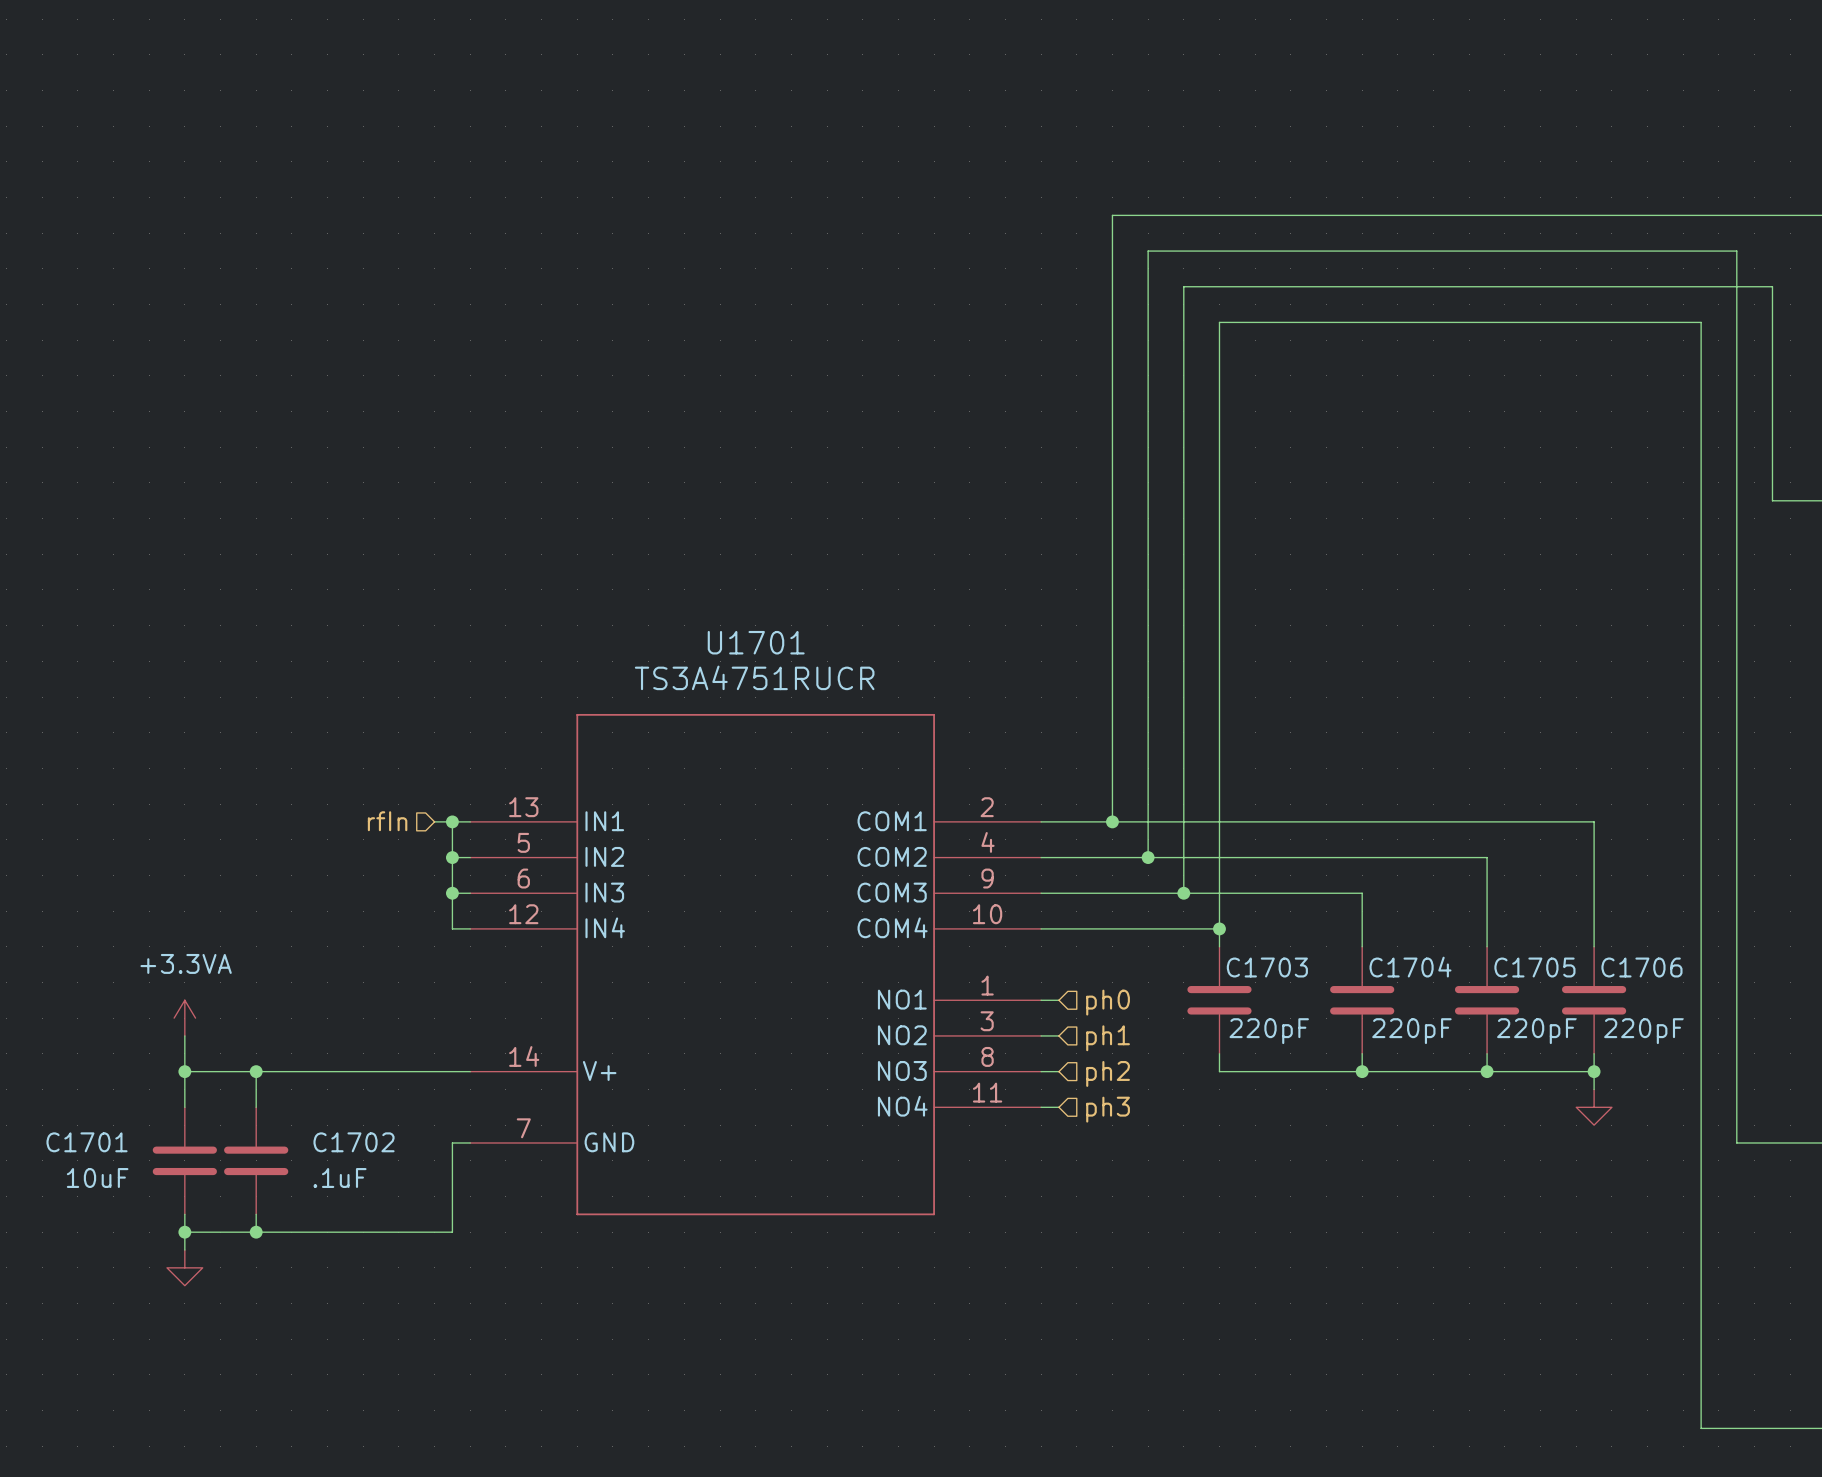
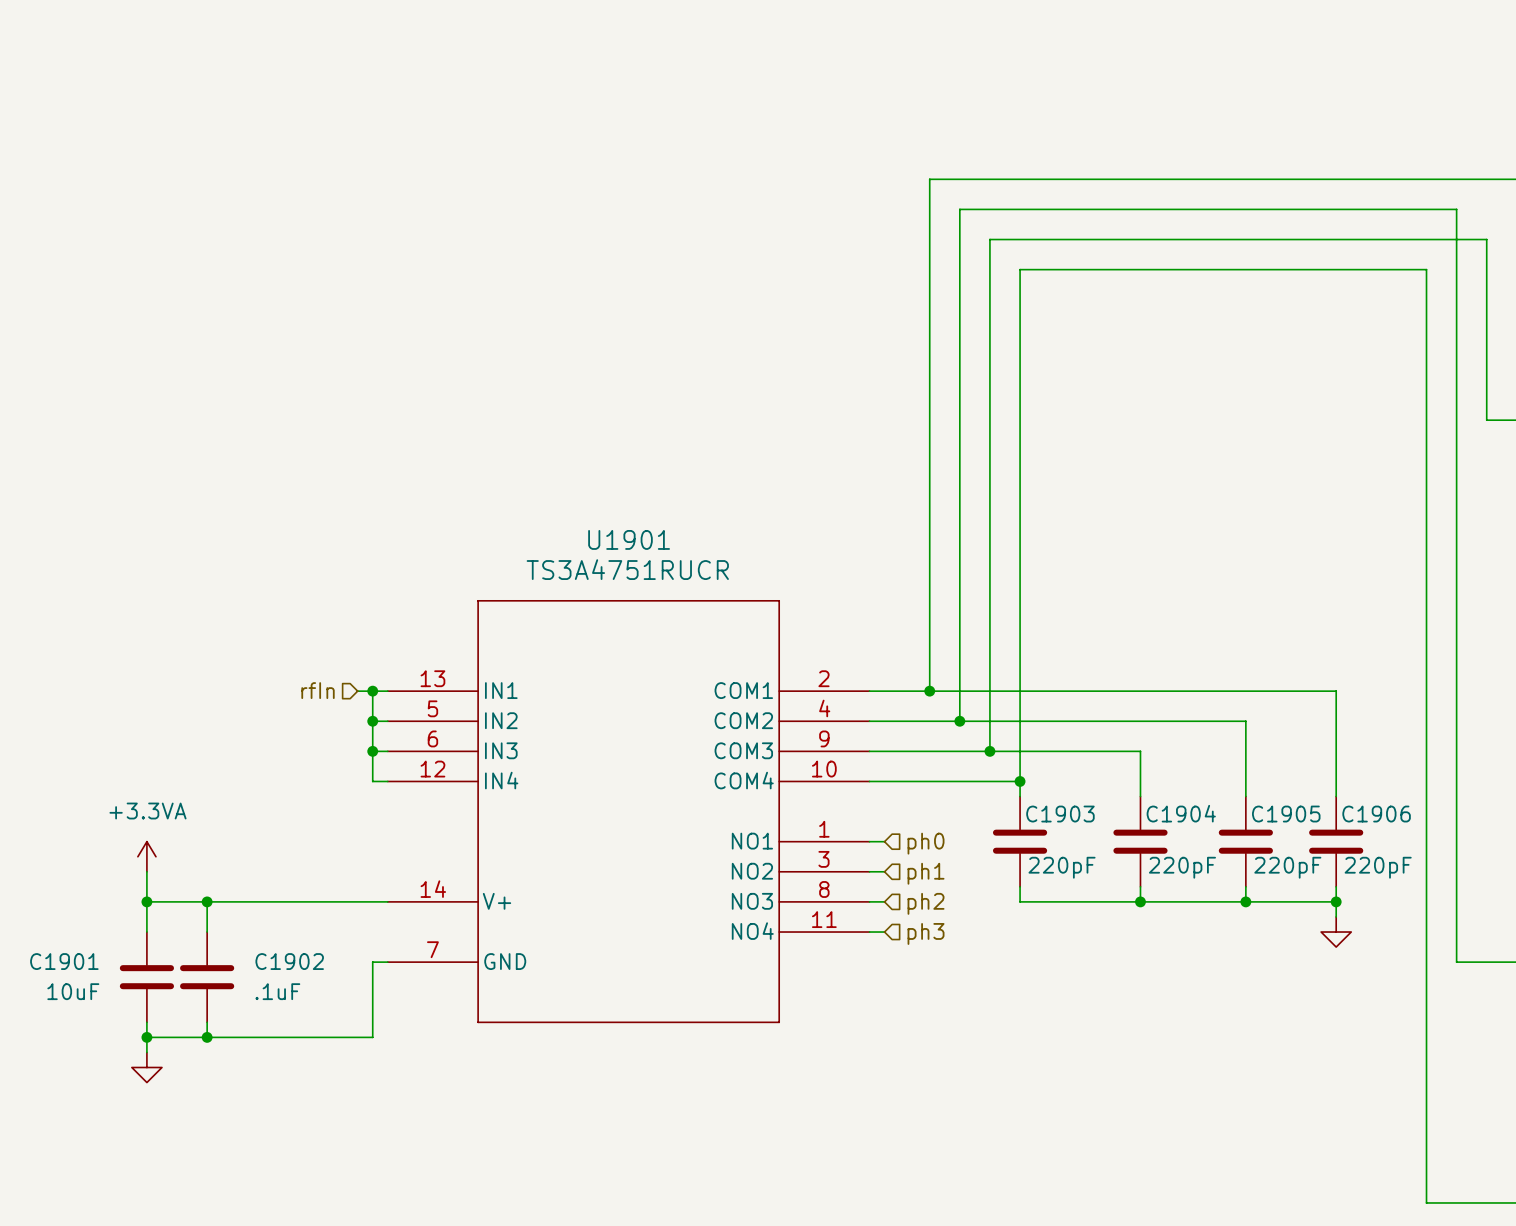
U1701 name: U1701 (756, 642) -> U1901 (629, 539)
C1703 name: C1703 (1267, 967) -> C1903 (1060, 814)
C1704 name: C1704 (1410, 967) -> C1904 (1181, 813)
C1705 name: C1705 (1534, 967) -> C1905 (1286, 814)
C1706 name: C1706 (1641, 967) -> C1906 (1376, 814)
C1701 name: C1701 (87, 1142) -> C1901 (64, 961)
C1702 name: C1702 (354, 1142) -> C1902 (289, 961)

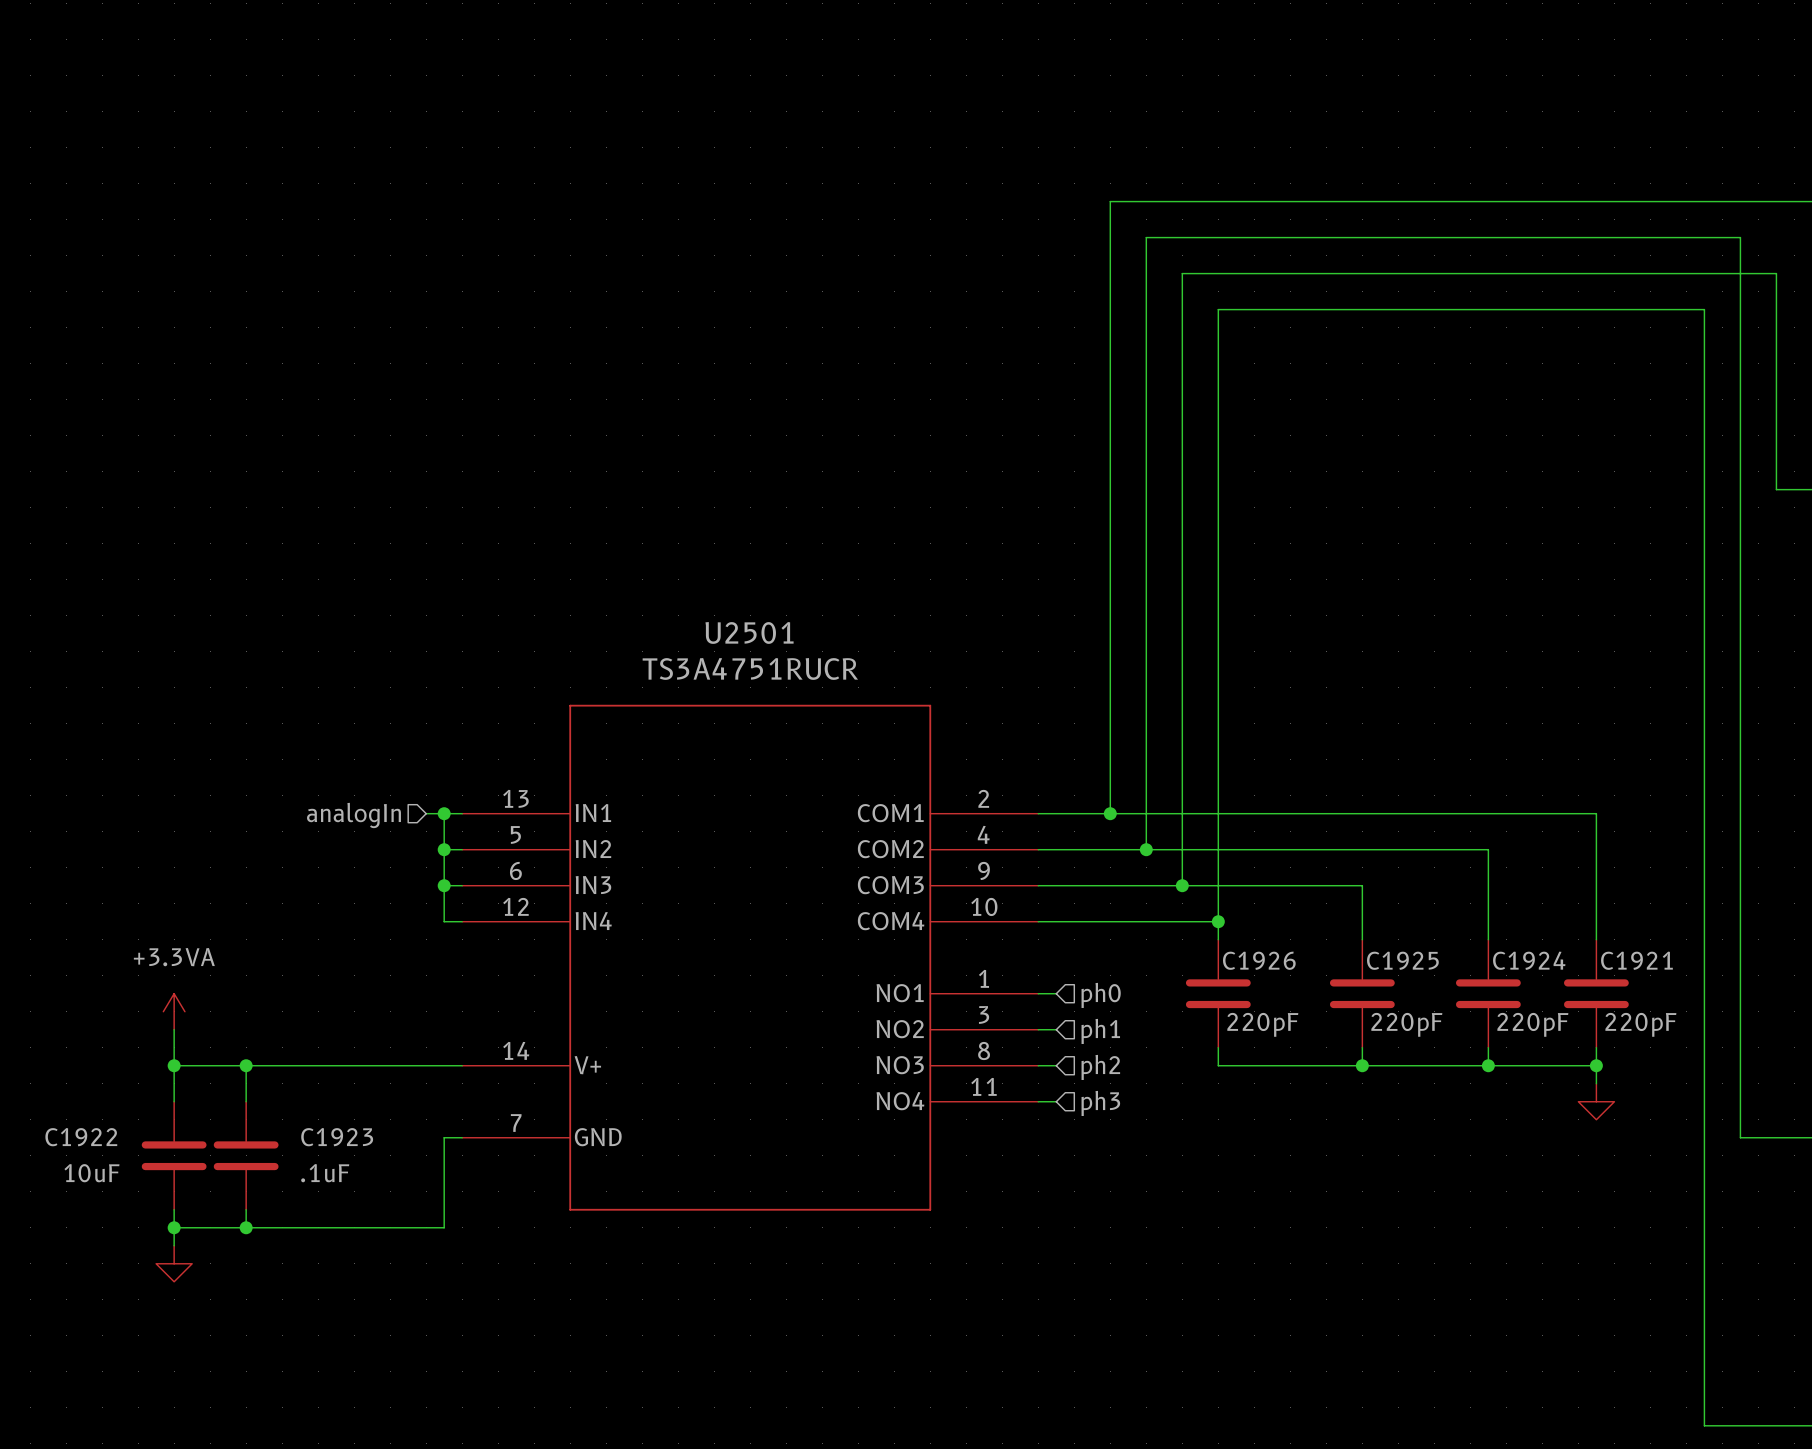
U1901 name: U1901 (629, 539) -> U2501 (749, 632)
hierarchical label: rfIn (318, 690) -> analogIn (353, 815)
C1904 name: C1904 (1181, 813) -> C1925 (1402, 960)
C1903 name: C1903 (1060, 814) -> C1926 (1259, 960)
C1905 name: C1905 (1286, 814) -> C1924 (1529, 960)
C1906 name: C1906 (1376, 814) -> C1921 (1636, 960)
C1901 name: C1901 (64, 961) -> C1922 (81, 1137)
C1902 name: C1902 (289, 961) -> C1923 (337, 1137)

